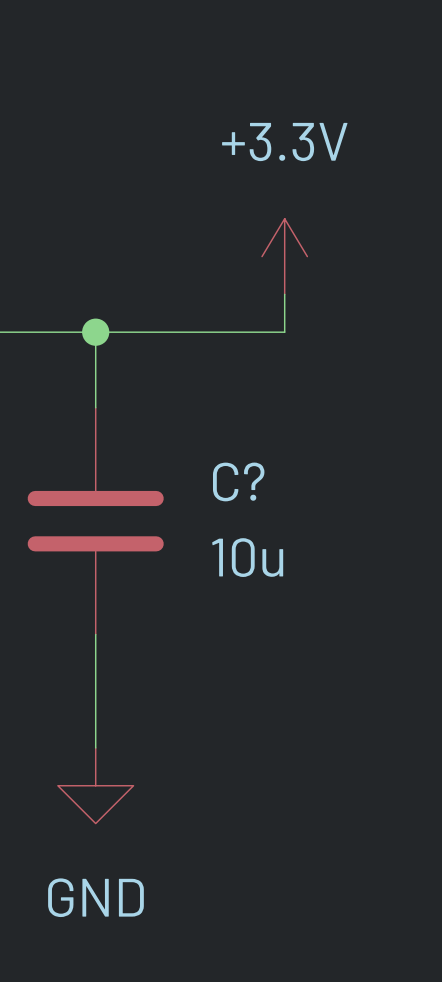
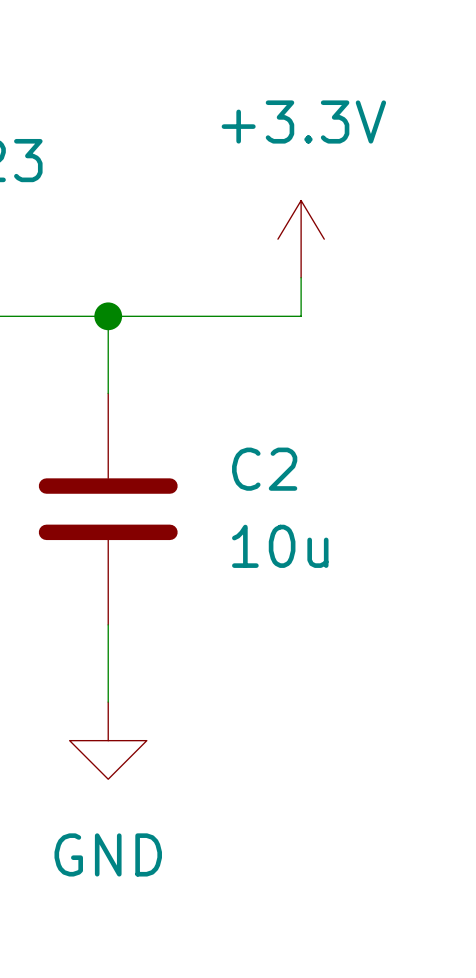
C? name: C? (238, 481) -> C2 (264, 469)
power symbol position: GND (95, 785) -> GND (108, 740)

